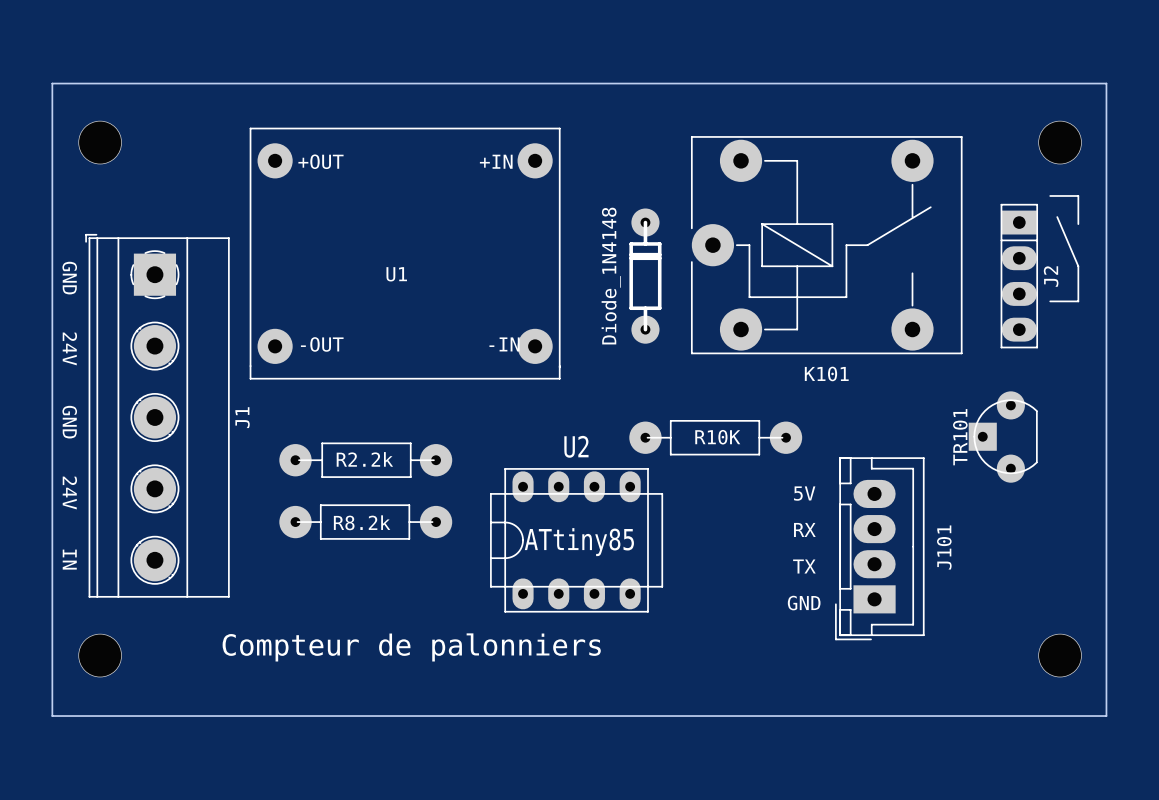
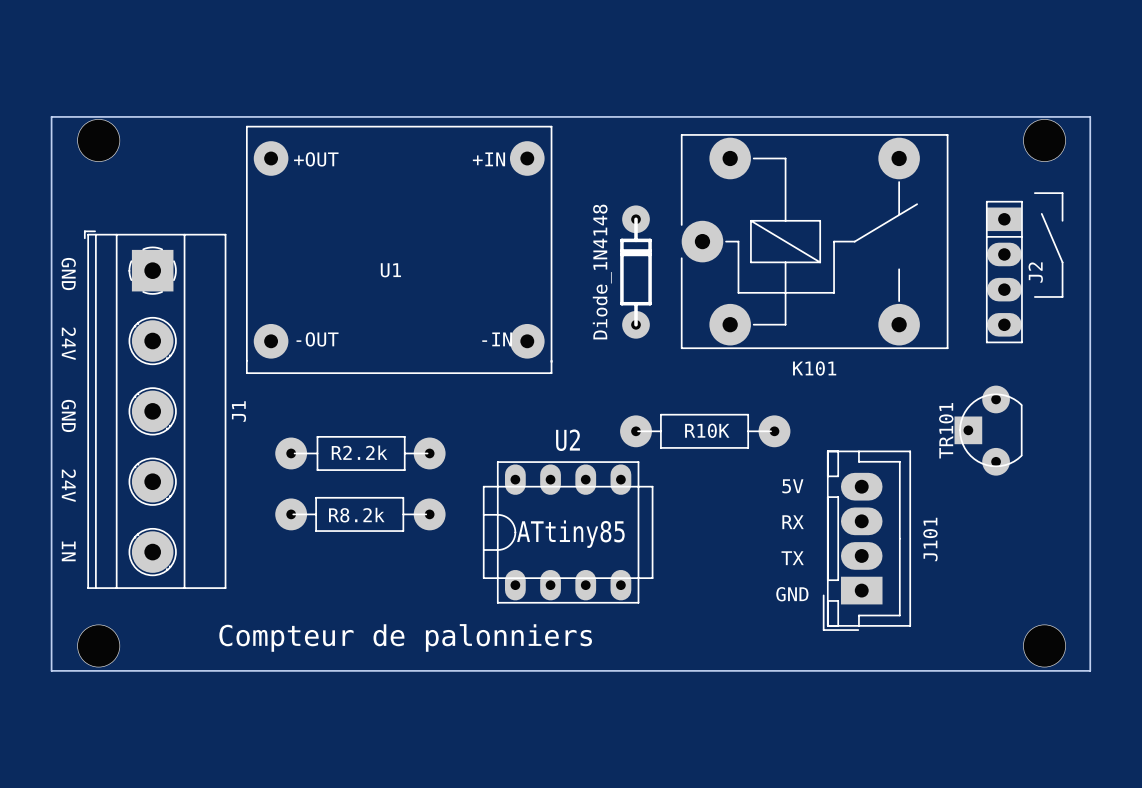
board edge: (52, 118) (52, 83) (1106, 83) (1106, 118) -> (51, 116) (1090, 116)
board edge: (52, 680) (52, 716) (1106, 716) (1106, 680) -> (51, 670) (1090, 670)

